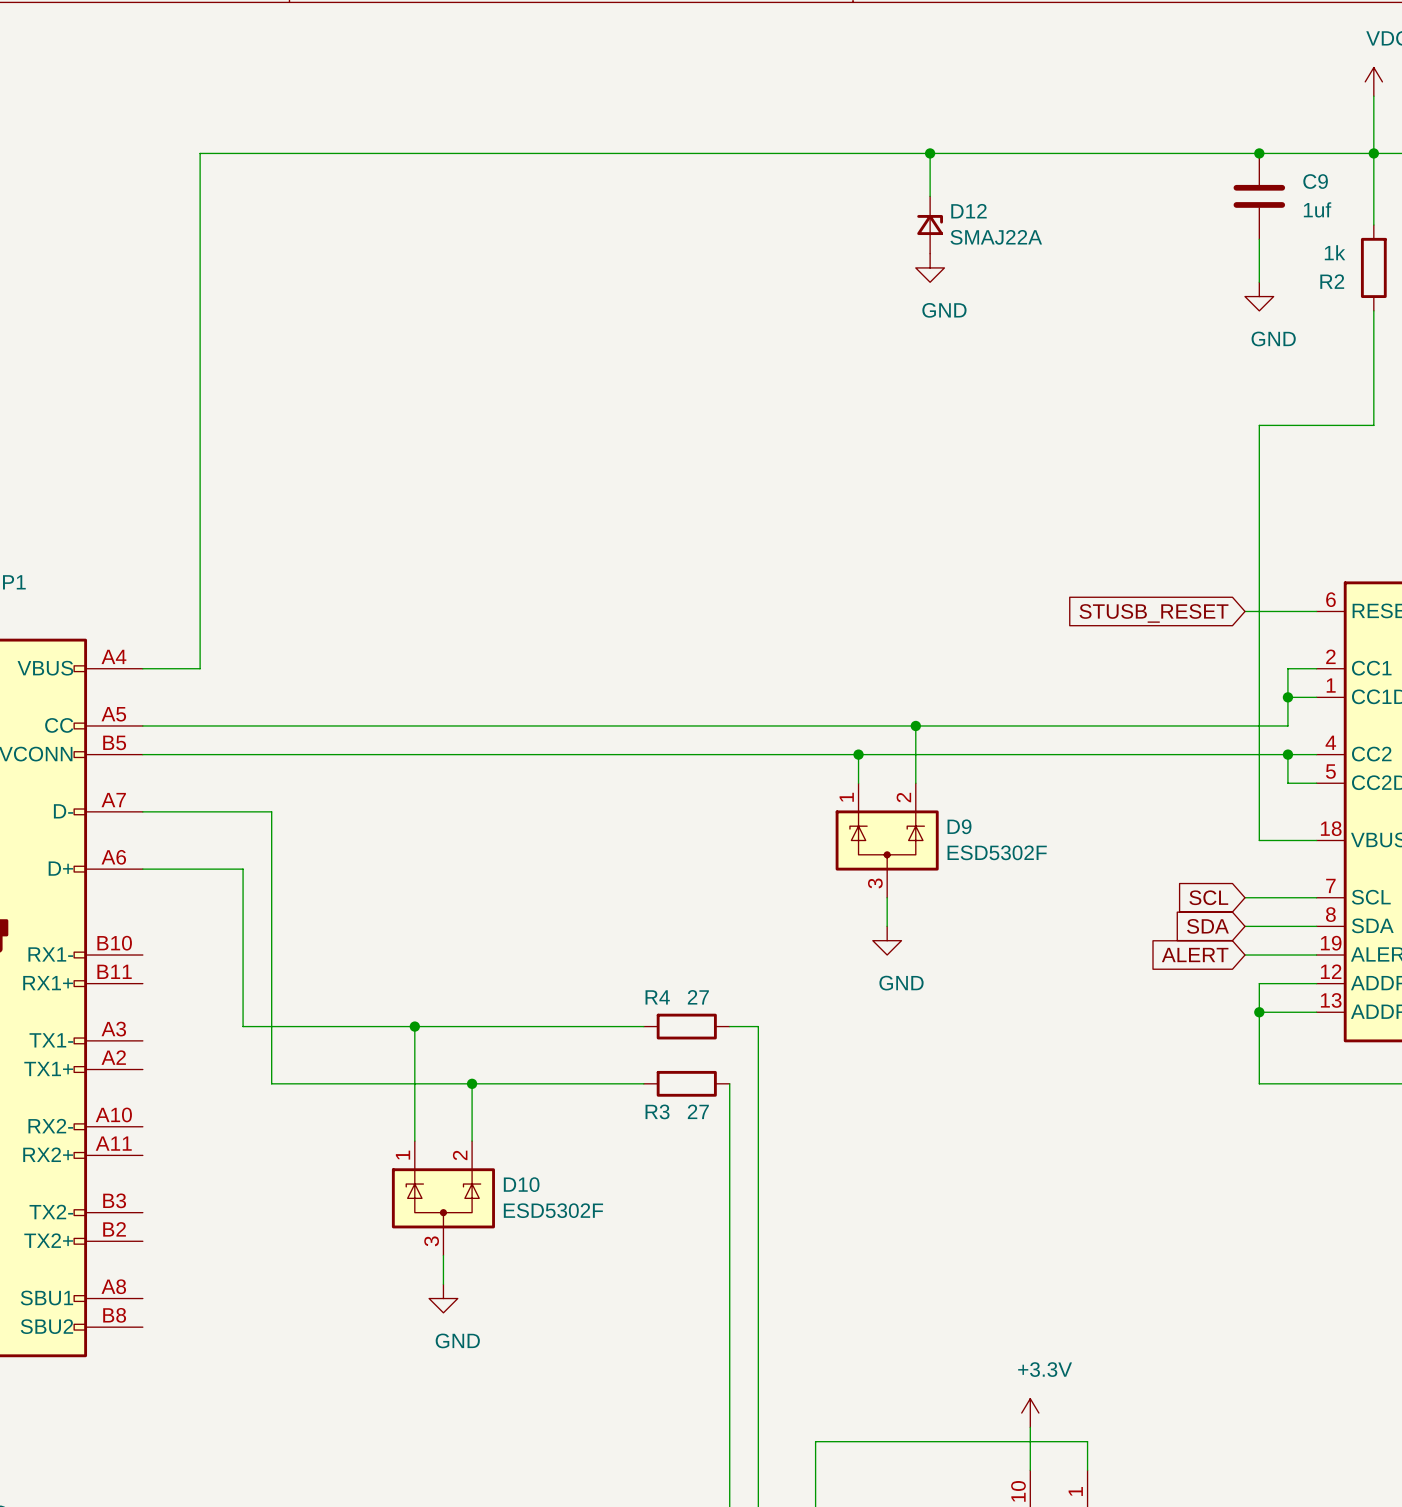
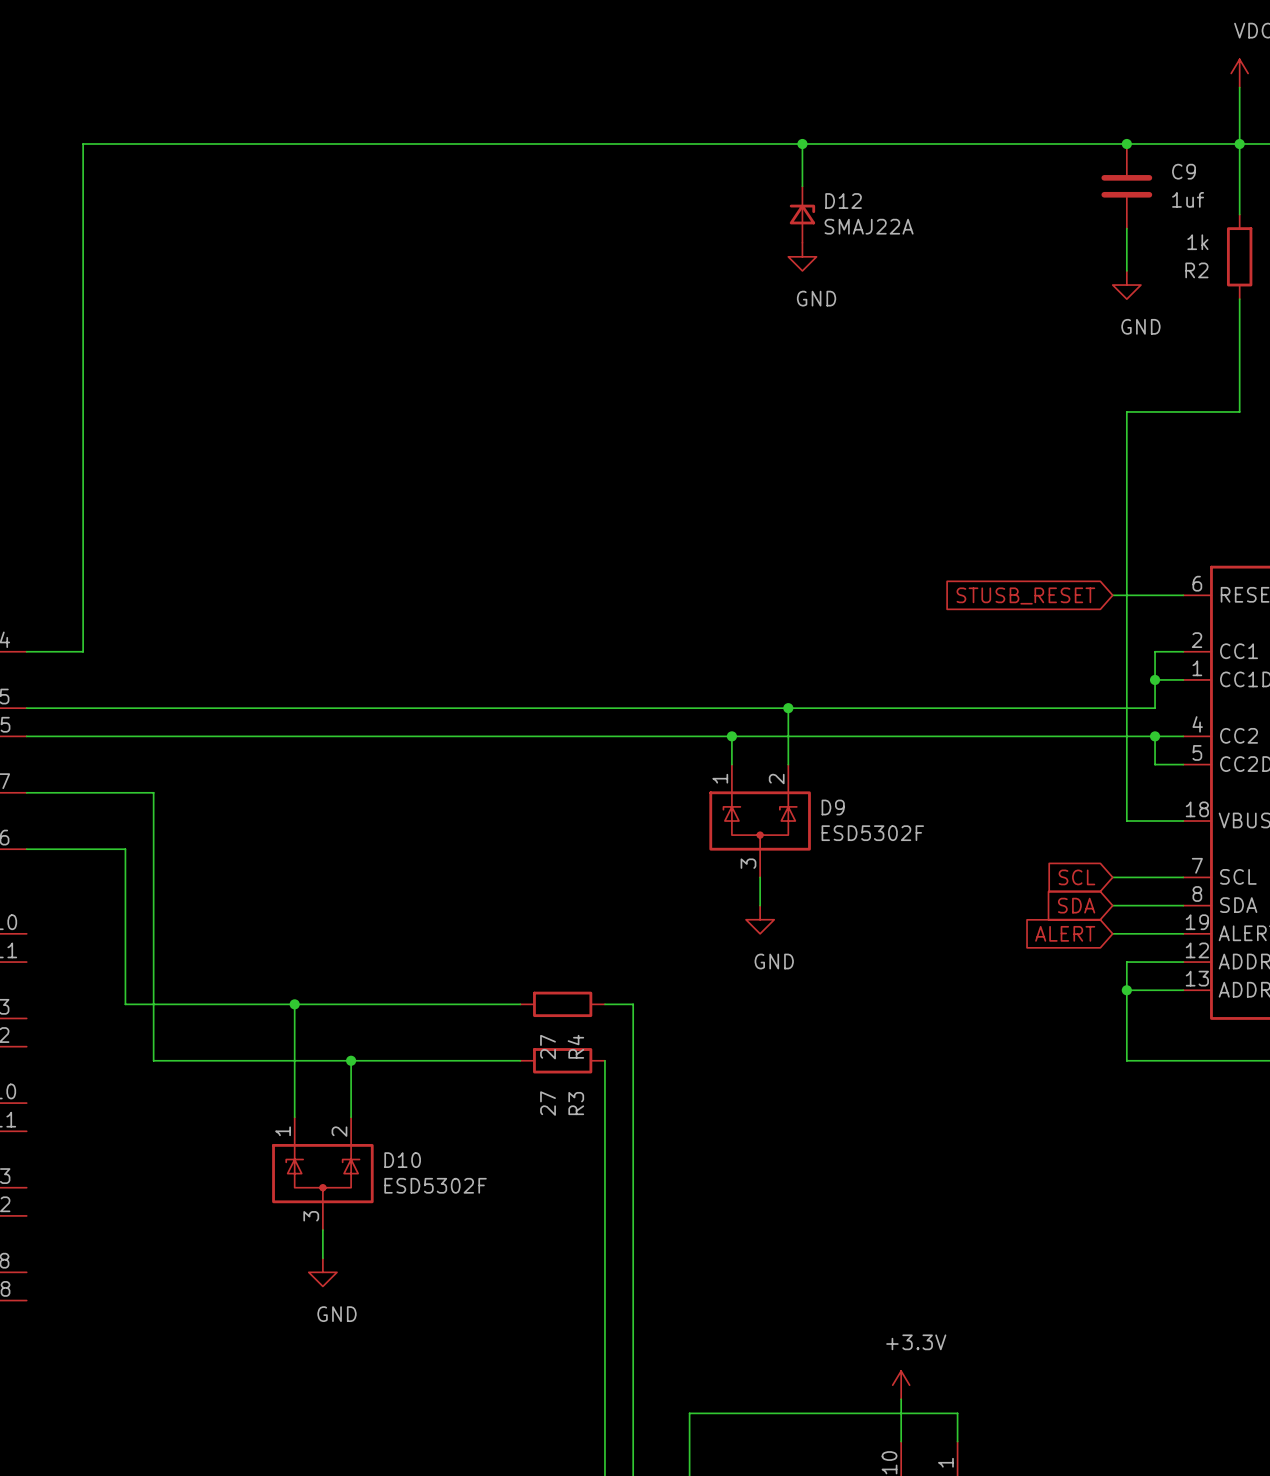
R4 name rotation: 0° (657, 997) -> 90° counterclockwise (575, 1046)
R4 name position: R4 (657, 997) -> R4 (575, 1046)
R4 value rotation: 0° (698, 997) -> 90° counterclockwise (548, 1047)
R4 value position: 27 (698, 997) -> 27 (548, 1047)
R3 name rotation: 0° (657, 1111) -> 90° counterclockwise (576, 1103)
R3 name position: R3 (657, 1111) -> R3 (576, 1103)
R3 value rotation: 0° (698, 1111) -> 90° counterclockwise (548, 1103)
R3 value position: 27 (698, 1111) -> 27 (548, 1103)

